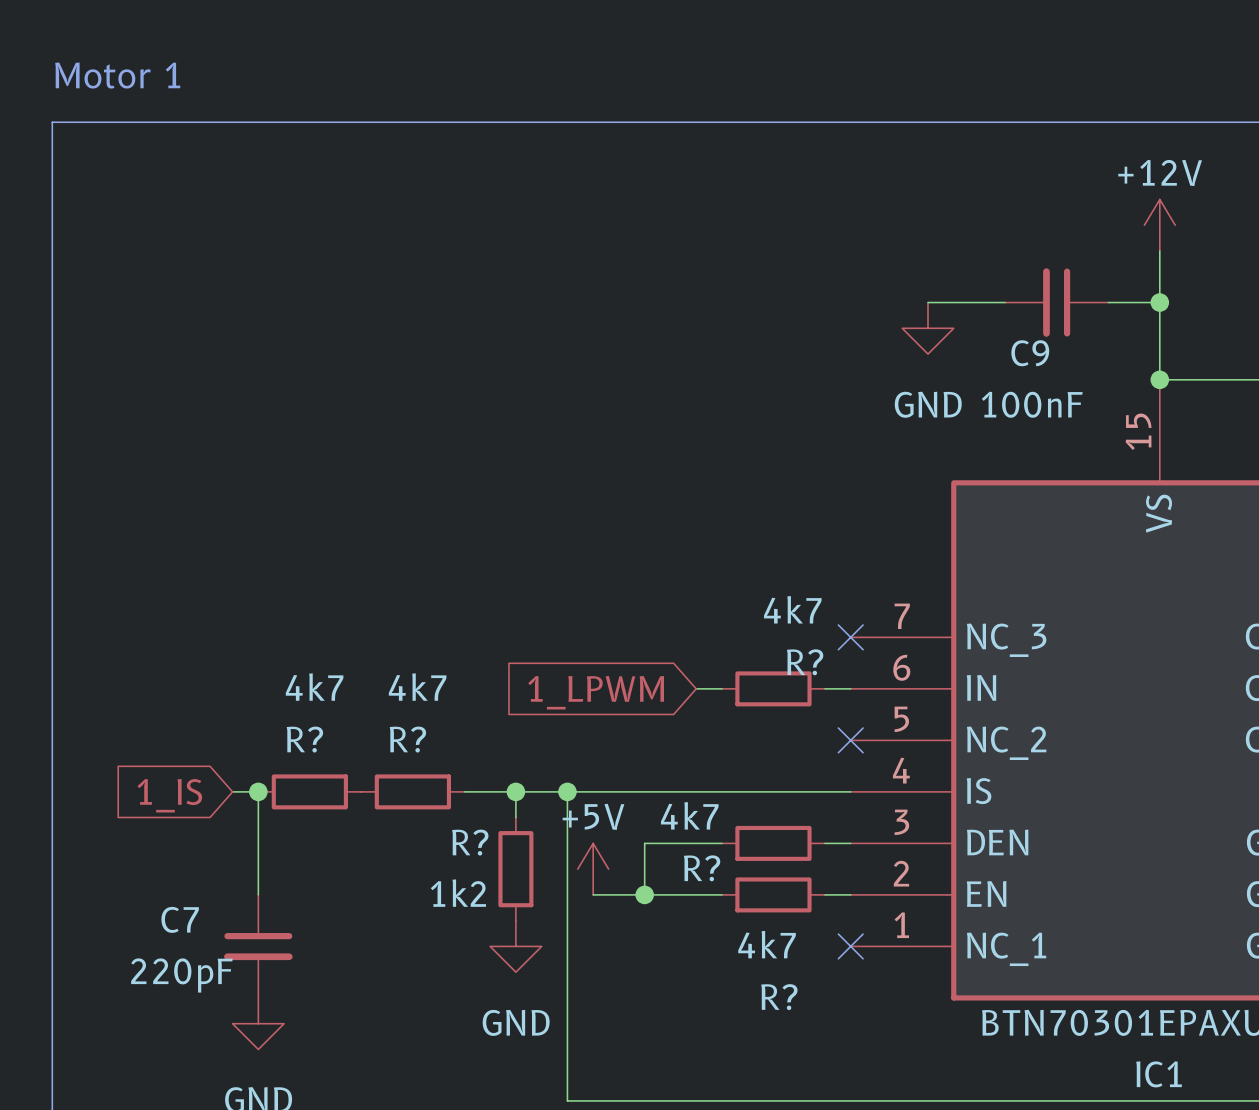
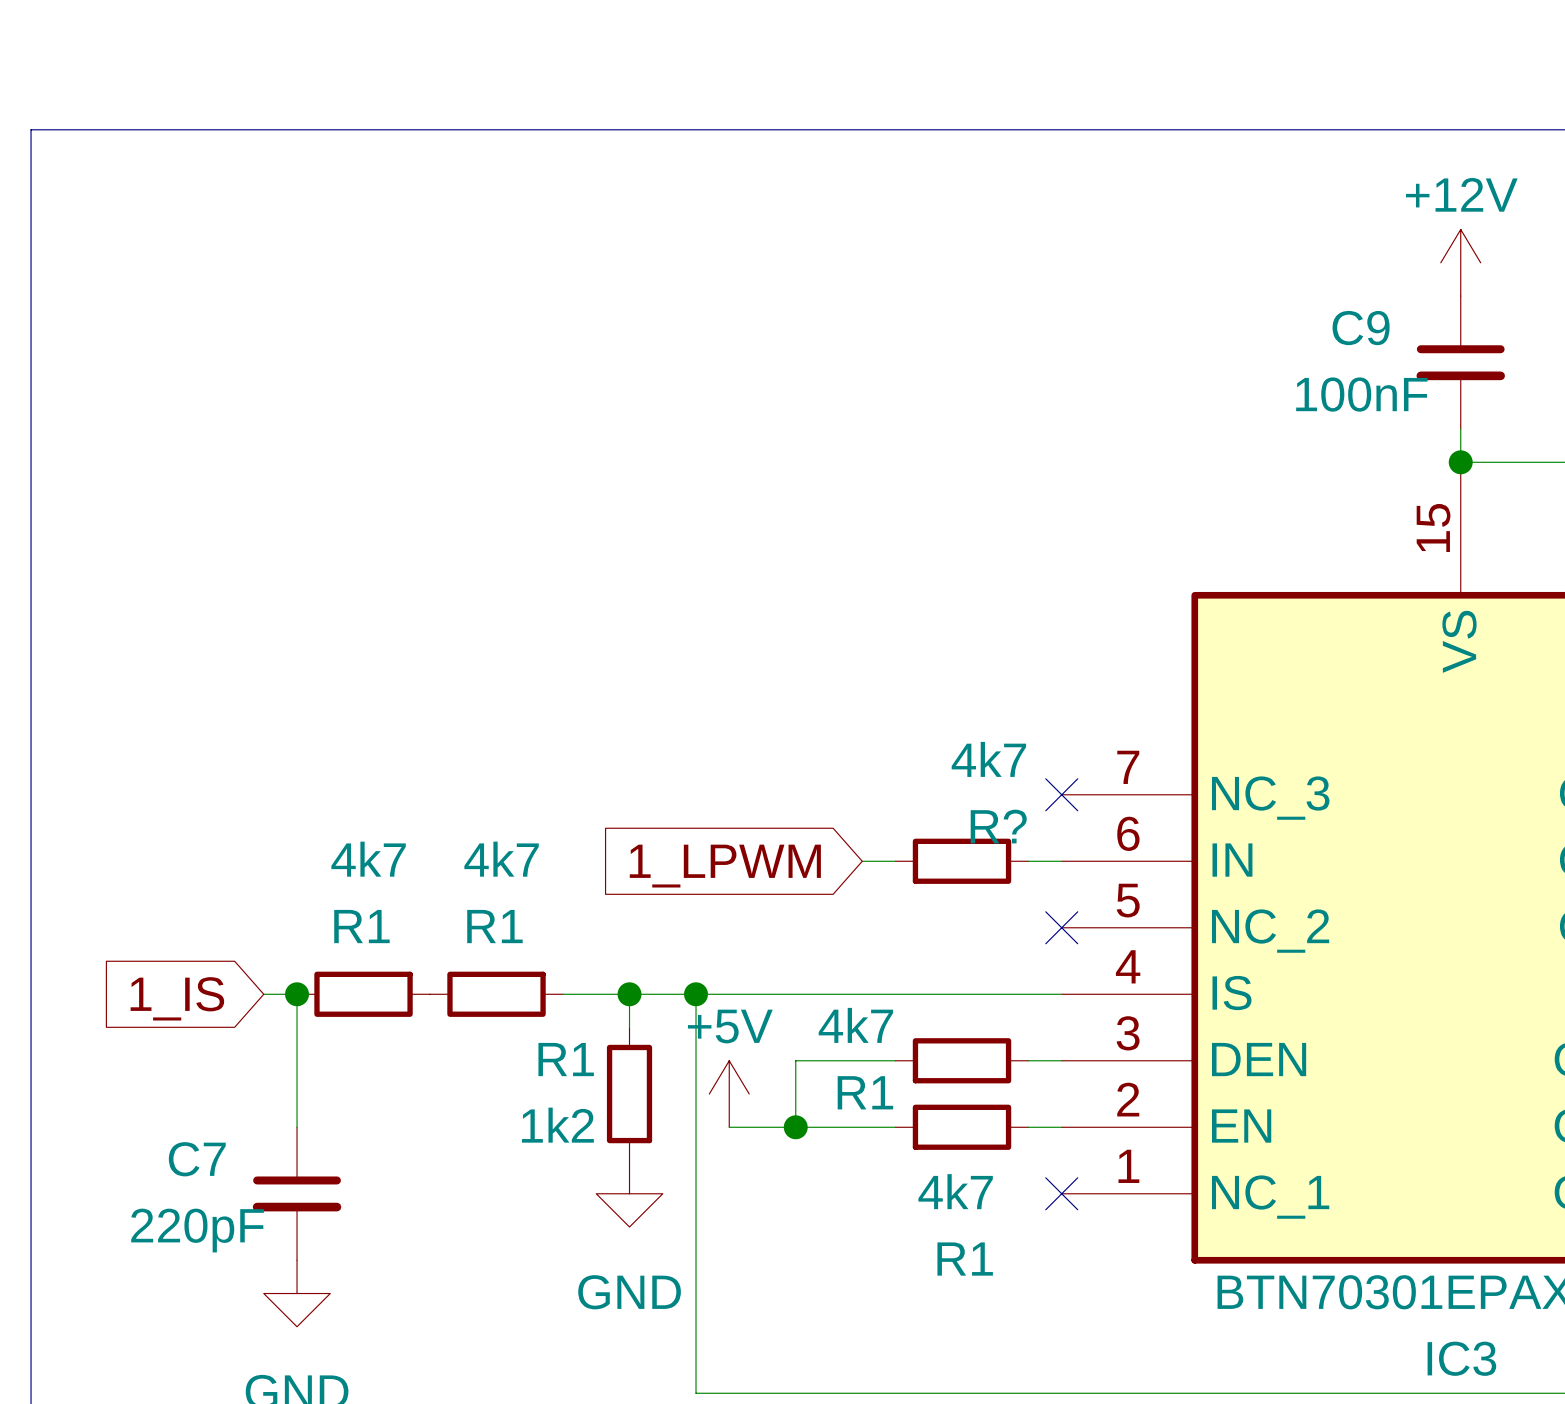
text: Motor 1 (117, 75) -> none
wire: (928, 302) (1005, 302) -> none
C9 rotation: 0° (1056, 302) -> 90° counterclockwise (1460, 362)
C9 position: (1056, 302) -> (1460, 362)
wire: (1108, 302) (1159, 302) -> none
junction: (1159, 302) -> none
power symbol: GND (928, 328) -> none
C9 name position: C9 (1030, 353) -> C9 (1361, 328)
C9 value position: 100nF (1032, 404) -> 100nF (1361, 394)
R? name: R? (304, 739) -> R1 (361, 926)
R? name: R? (407, 739) -> R1 (494, 926)
R? name: R? (470, 842) -> R1 (566, 1059)
R? name: R? (702, 868) -> R1 (865, 1092)
R? name: R? (779, 997) -> R1 (965, 1259)
IC1 name: IC1 (1159, 1074) -> IC3 (1461, 1358)

